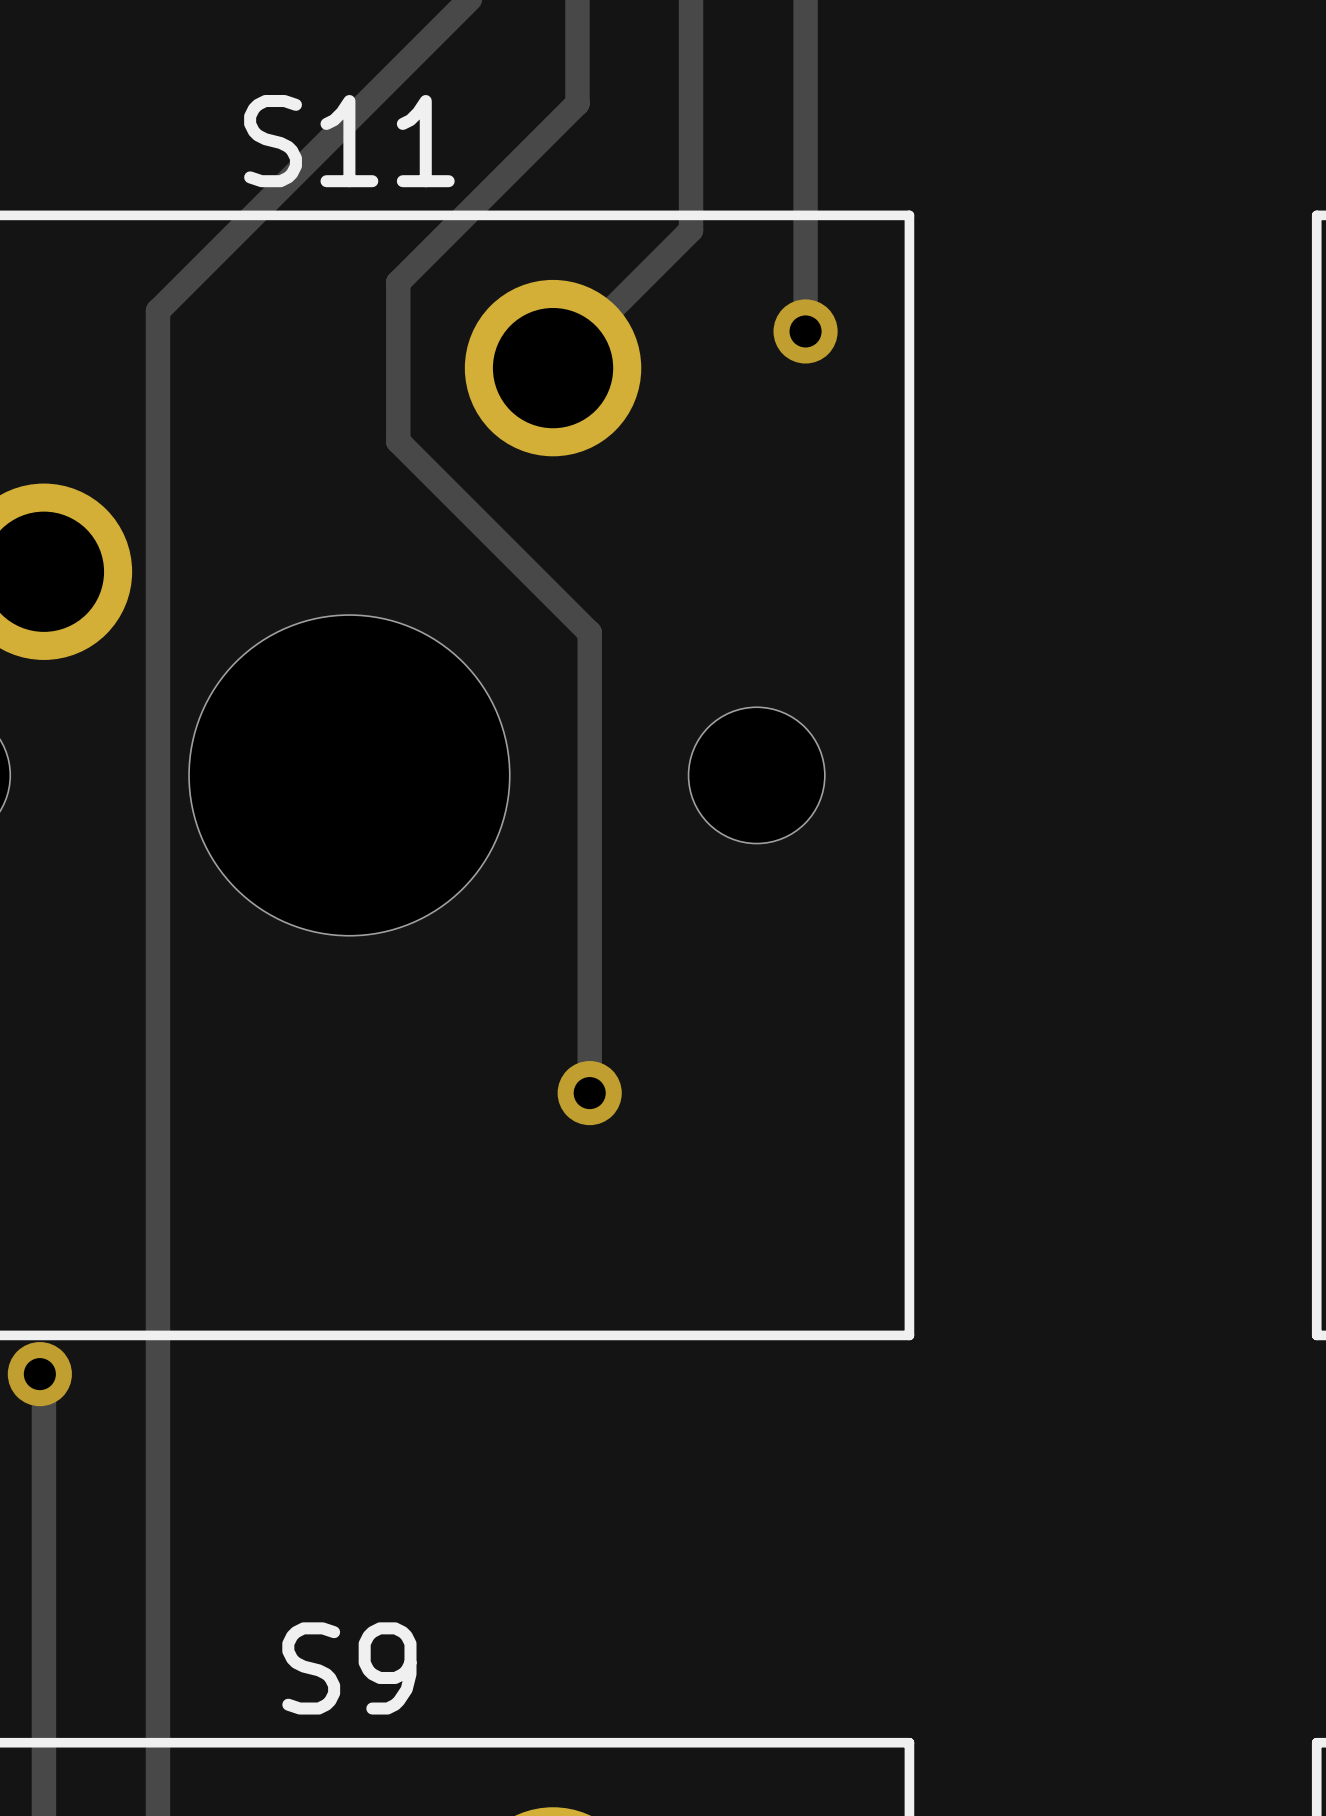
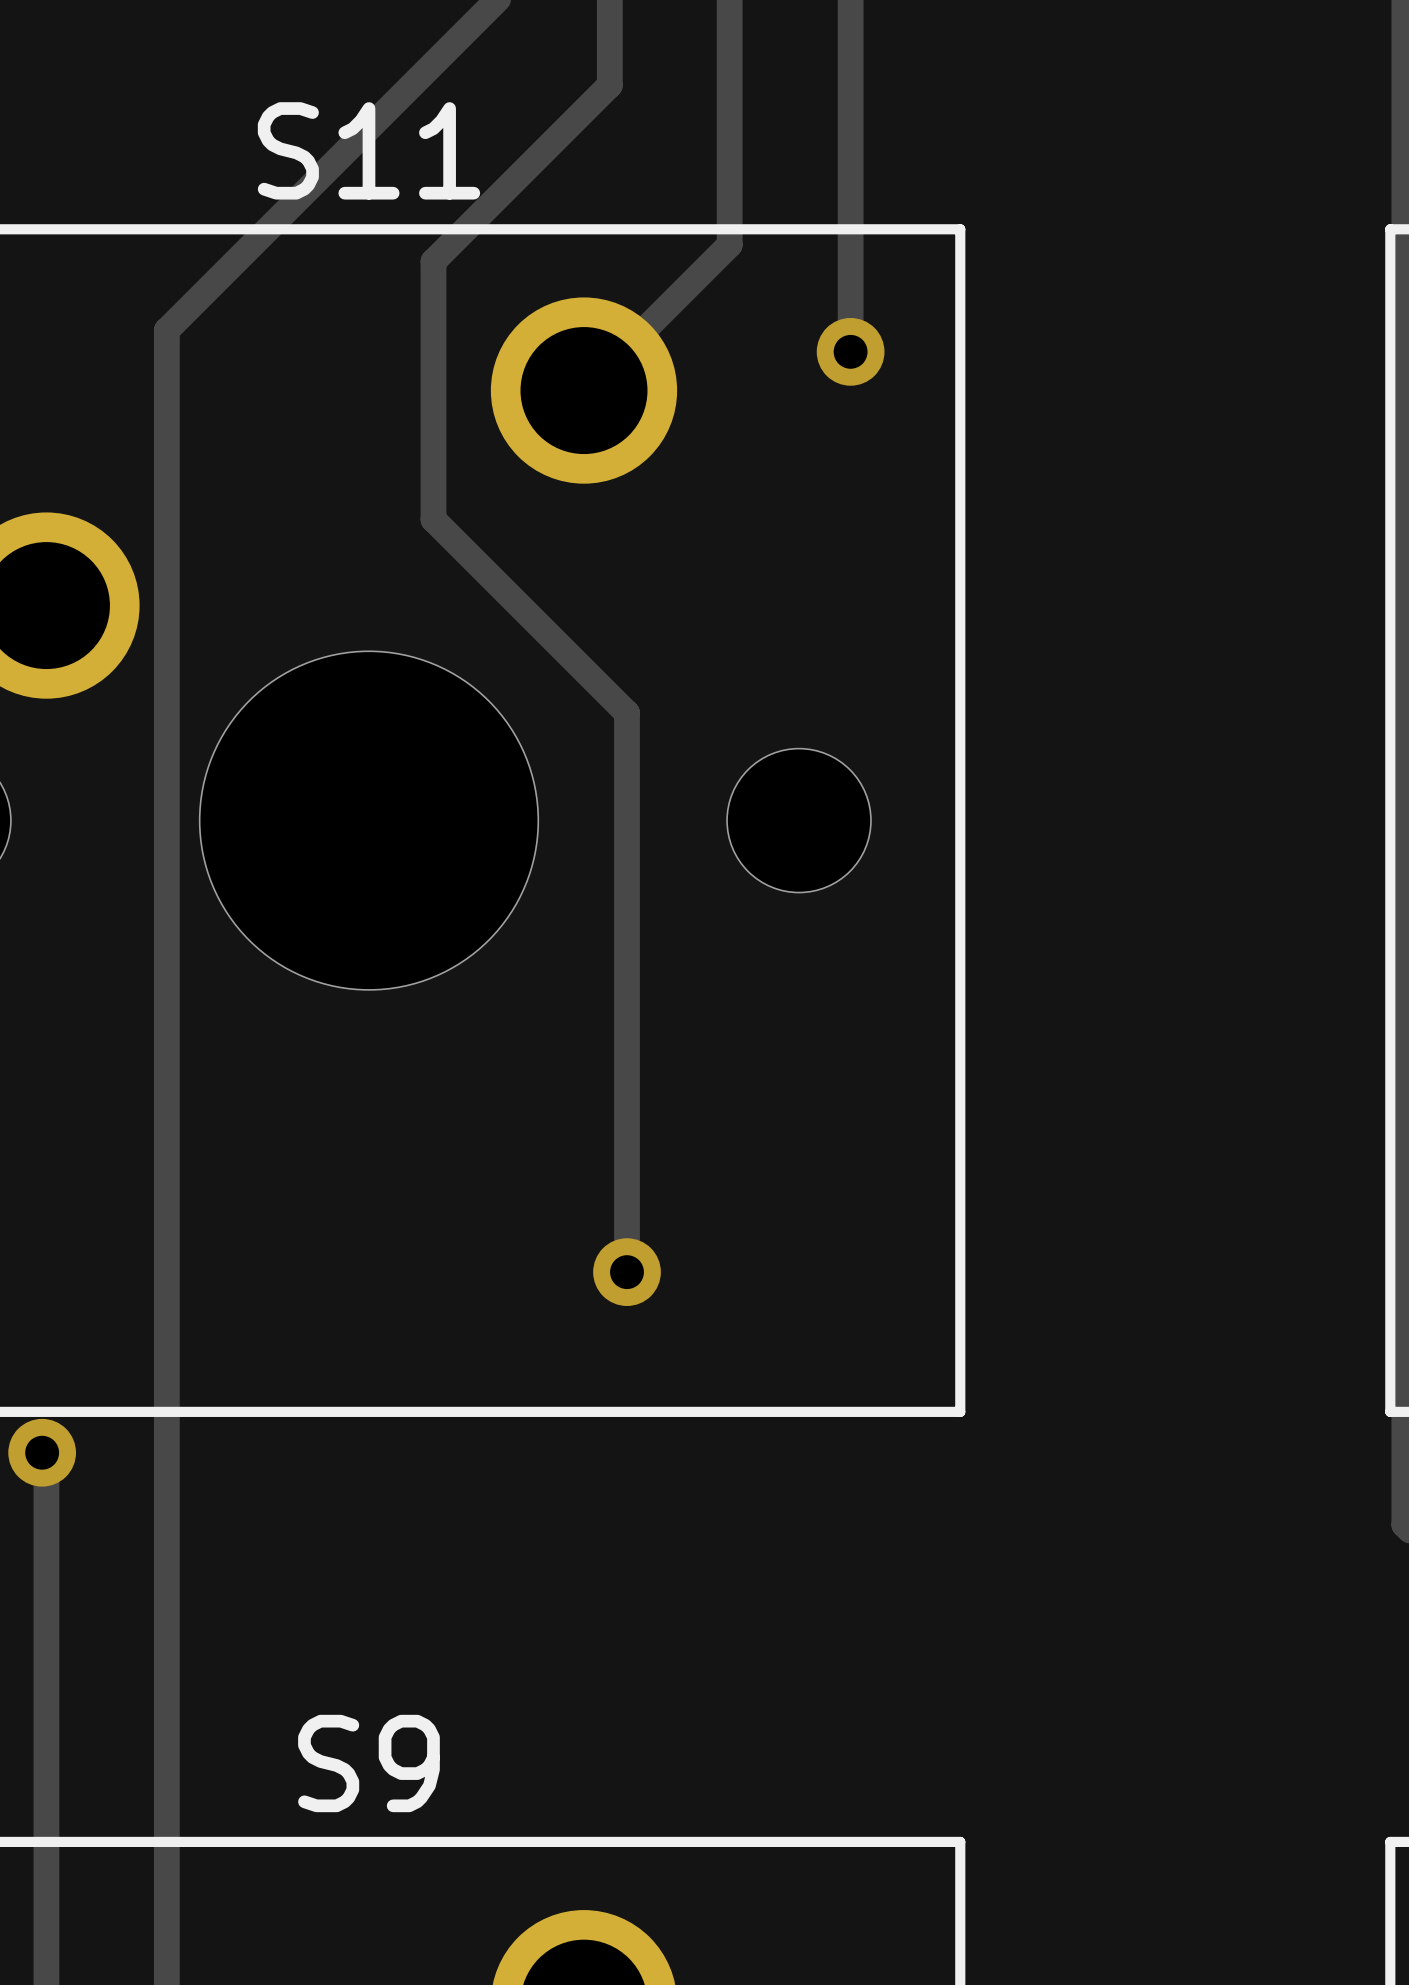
track: (577, 78) (577, 103) (398, 282) (398, 441) (589, 632) (589, 1093) -> (609, 85) (433, 261) (433, 519) (627, 713) (627, 1272)
via position: (589, 1093) -> (627, 1272)

